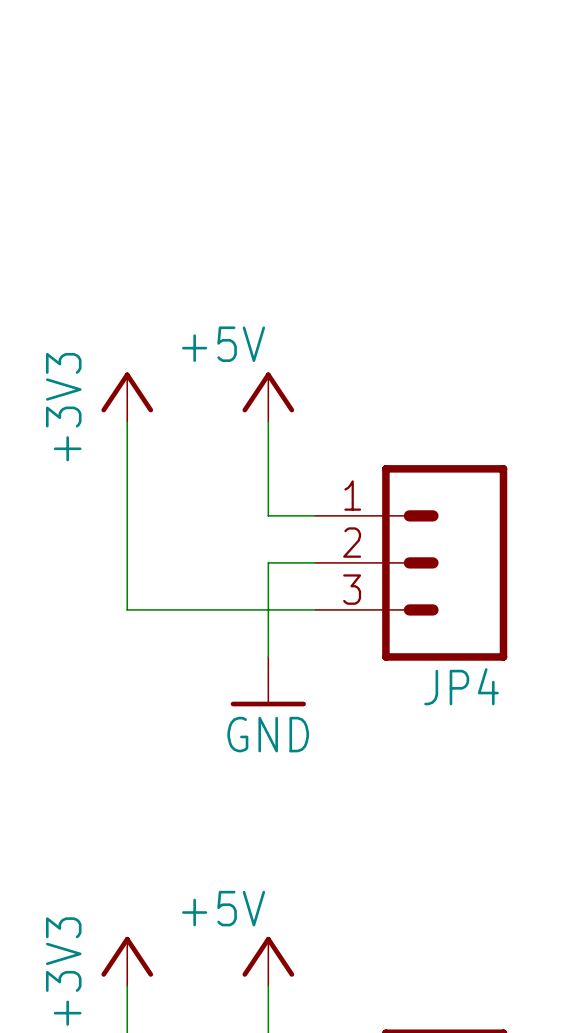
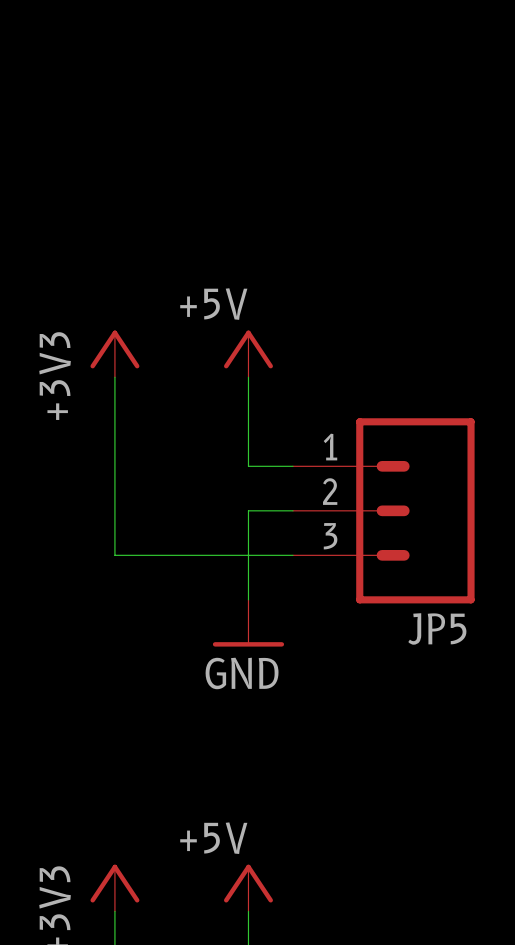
JP4 name: JP4 (461, 686) -> JP5 (437, 628)

